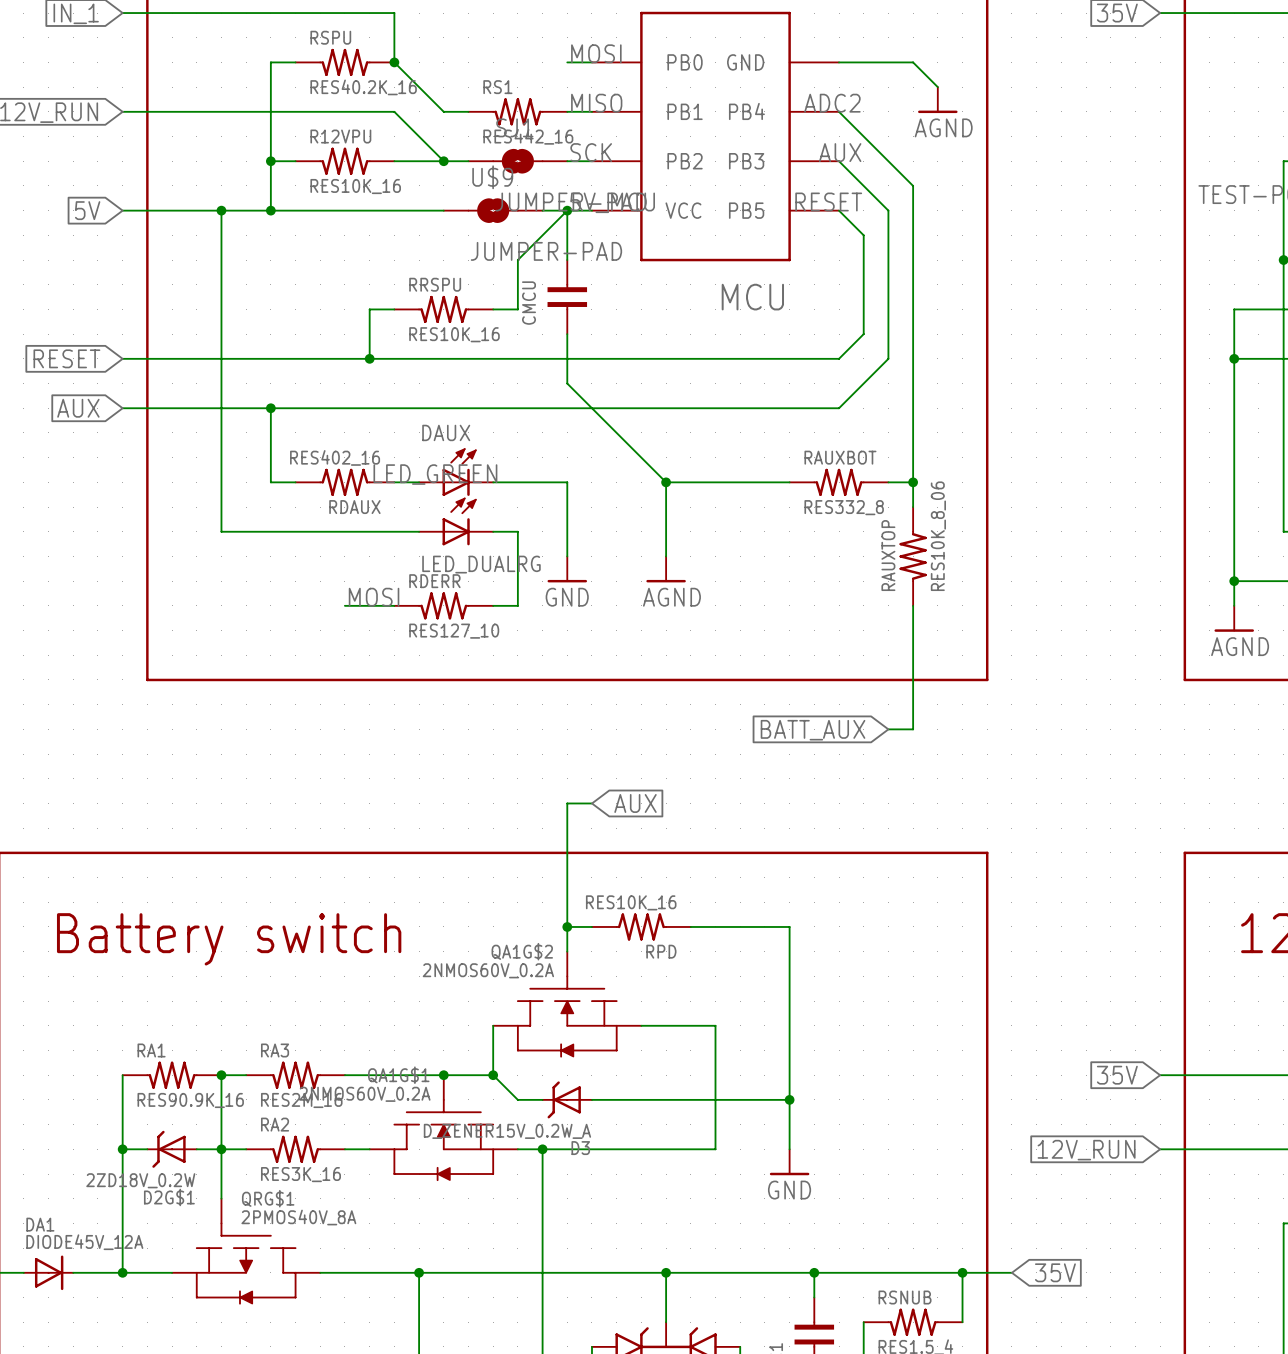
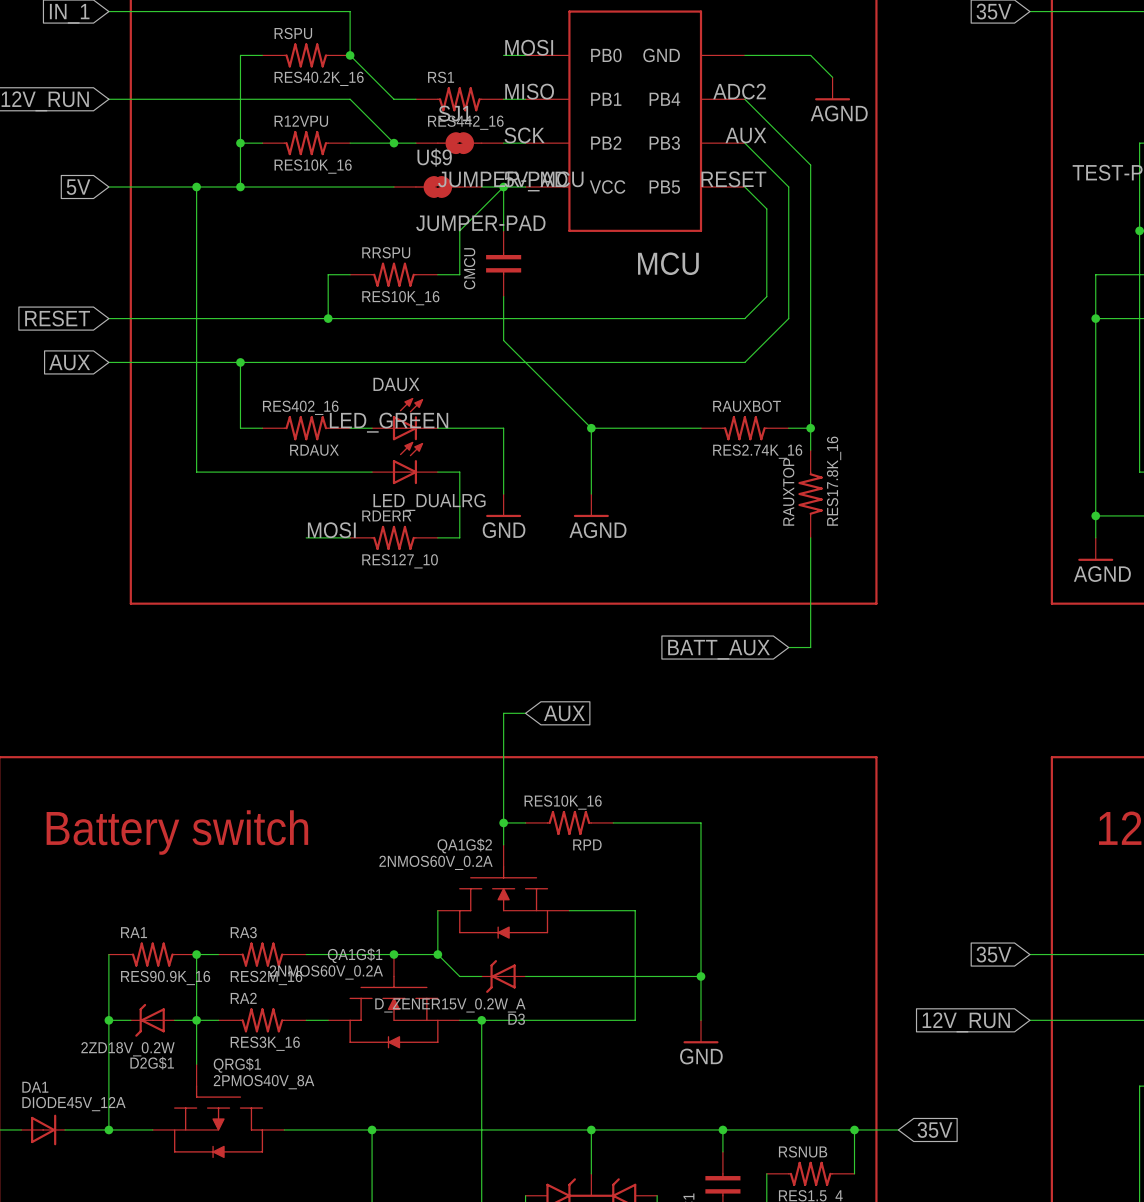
RAUXBOT value: RES332_8 (844, 507) -> RES2.74K_16 (757, 451)
RAUXTOP value: RES10K_8_06 (938, 536) -> RES17.8K_16 (834, 481)

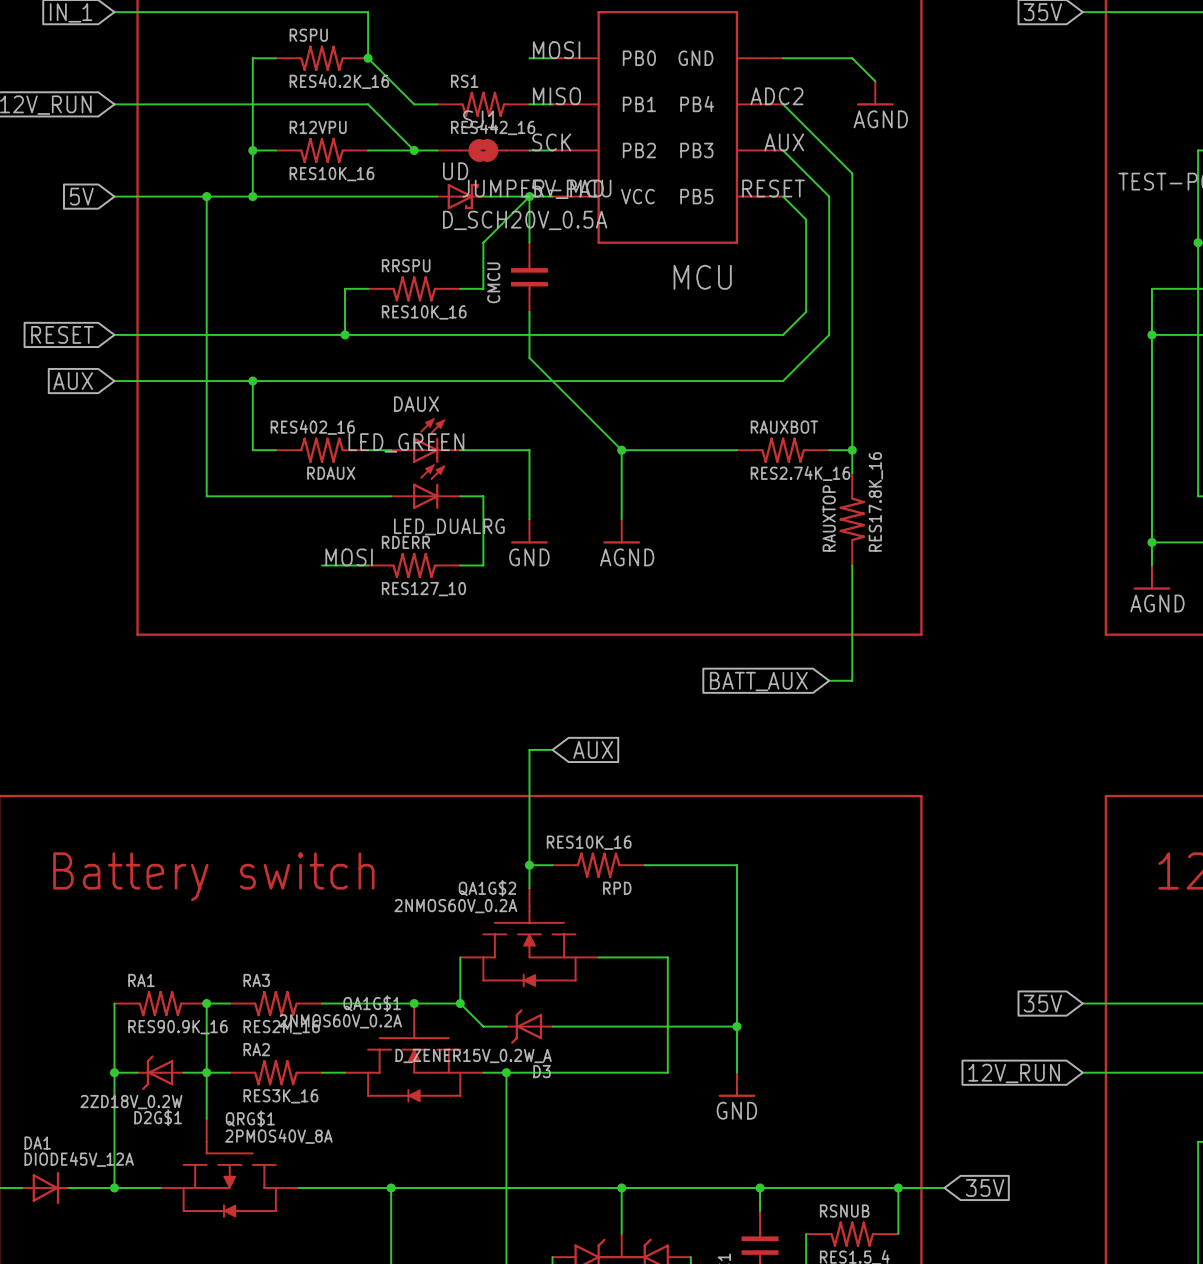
U$9: JUMPER-PAD (437, 187) -> none
UD: none -> D_SCH20V_0.5A (460, 196)

